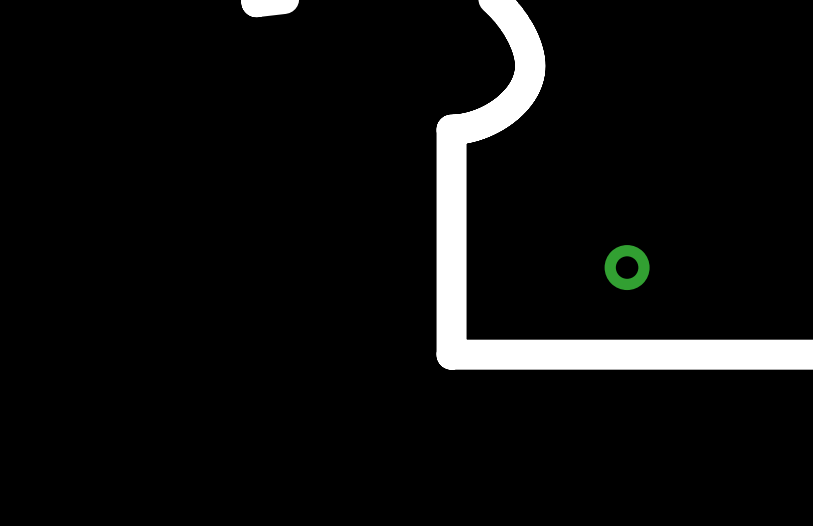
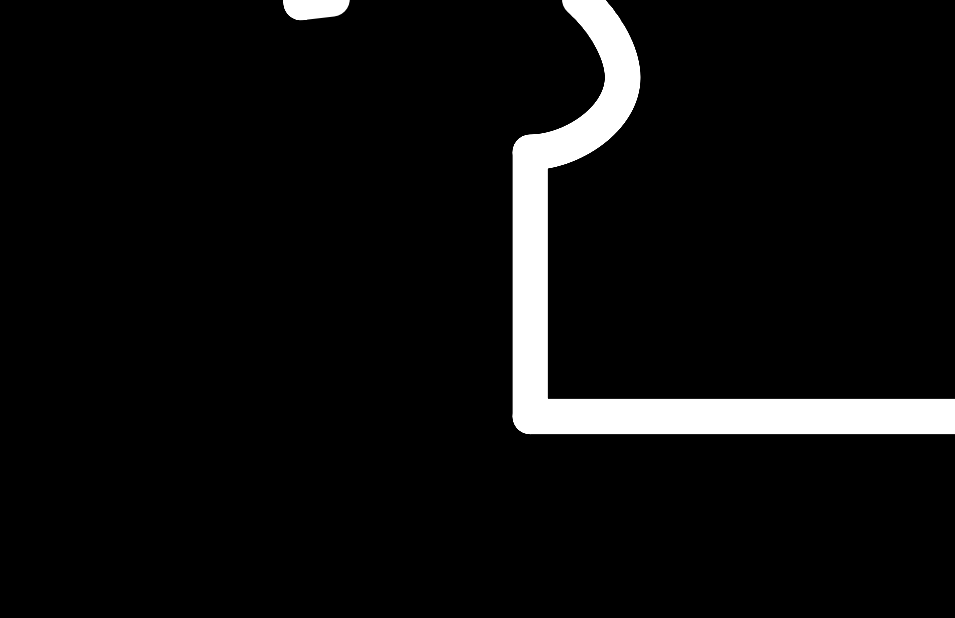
via: (627, 267) -> none

